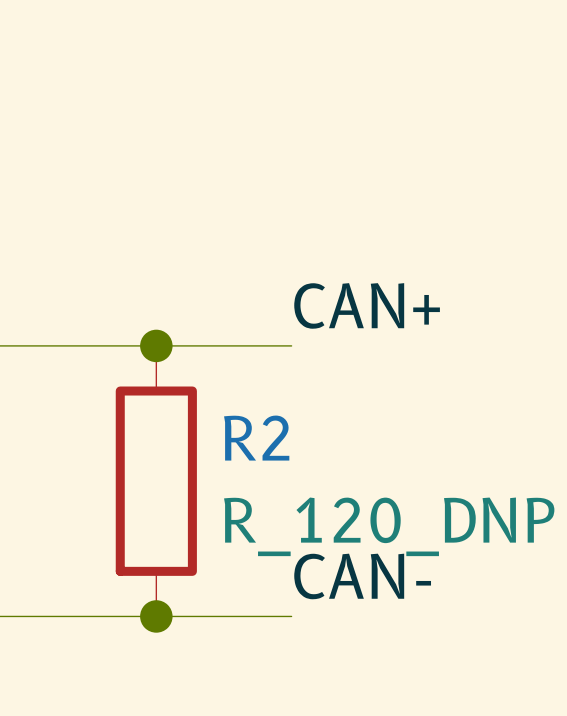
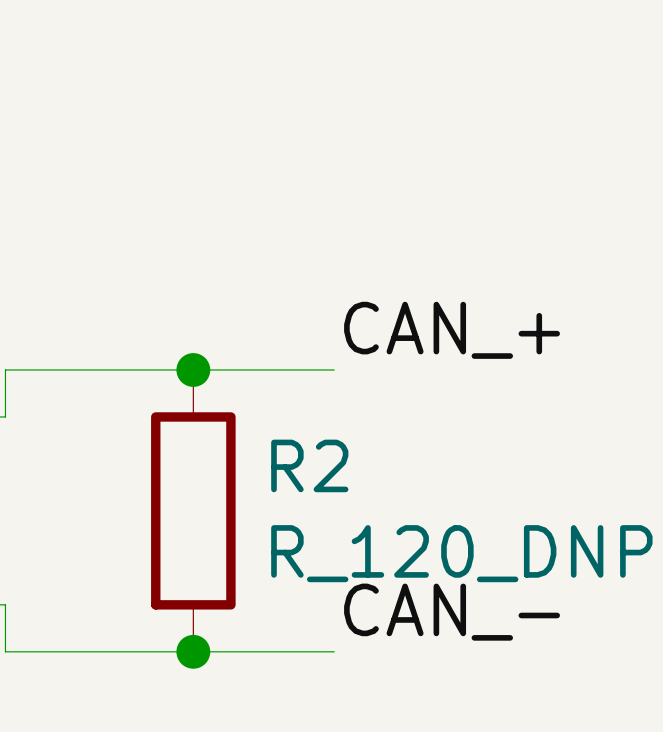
label: CAN+ (367, 305) -> CAN_+ (452, 330)
label: CAN- (362, 576) -> CAN_- (452, 612)

